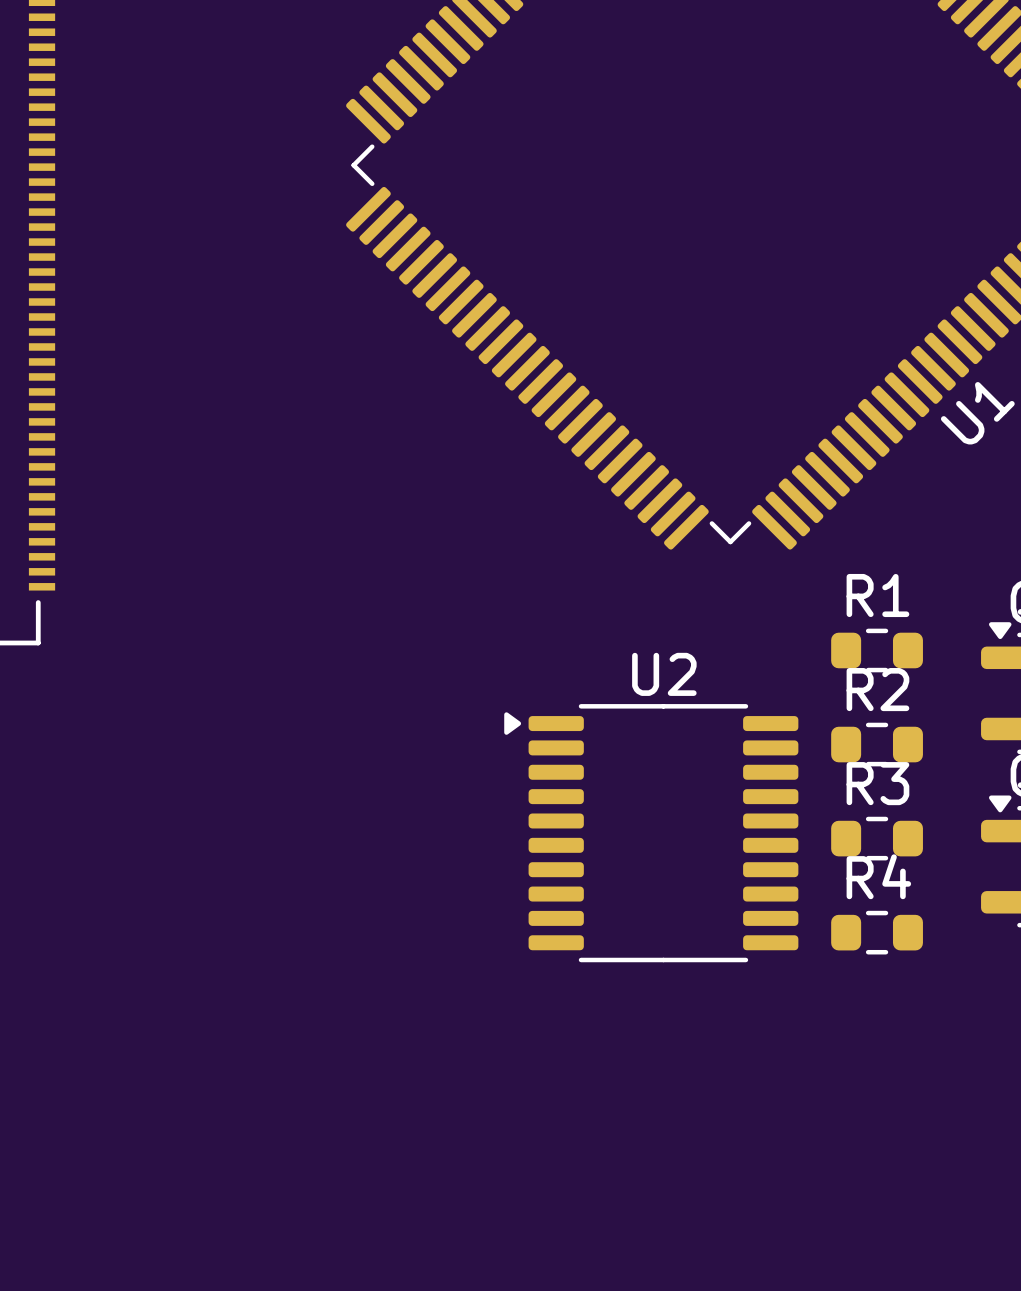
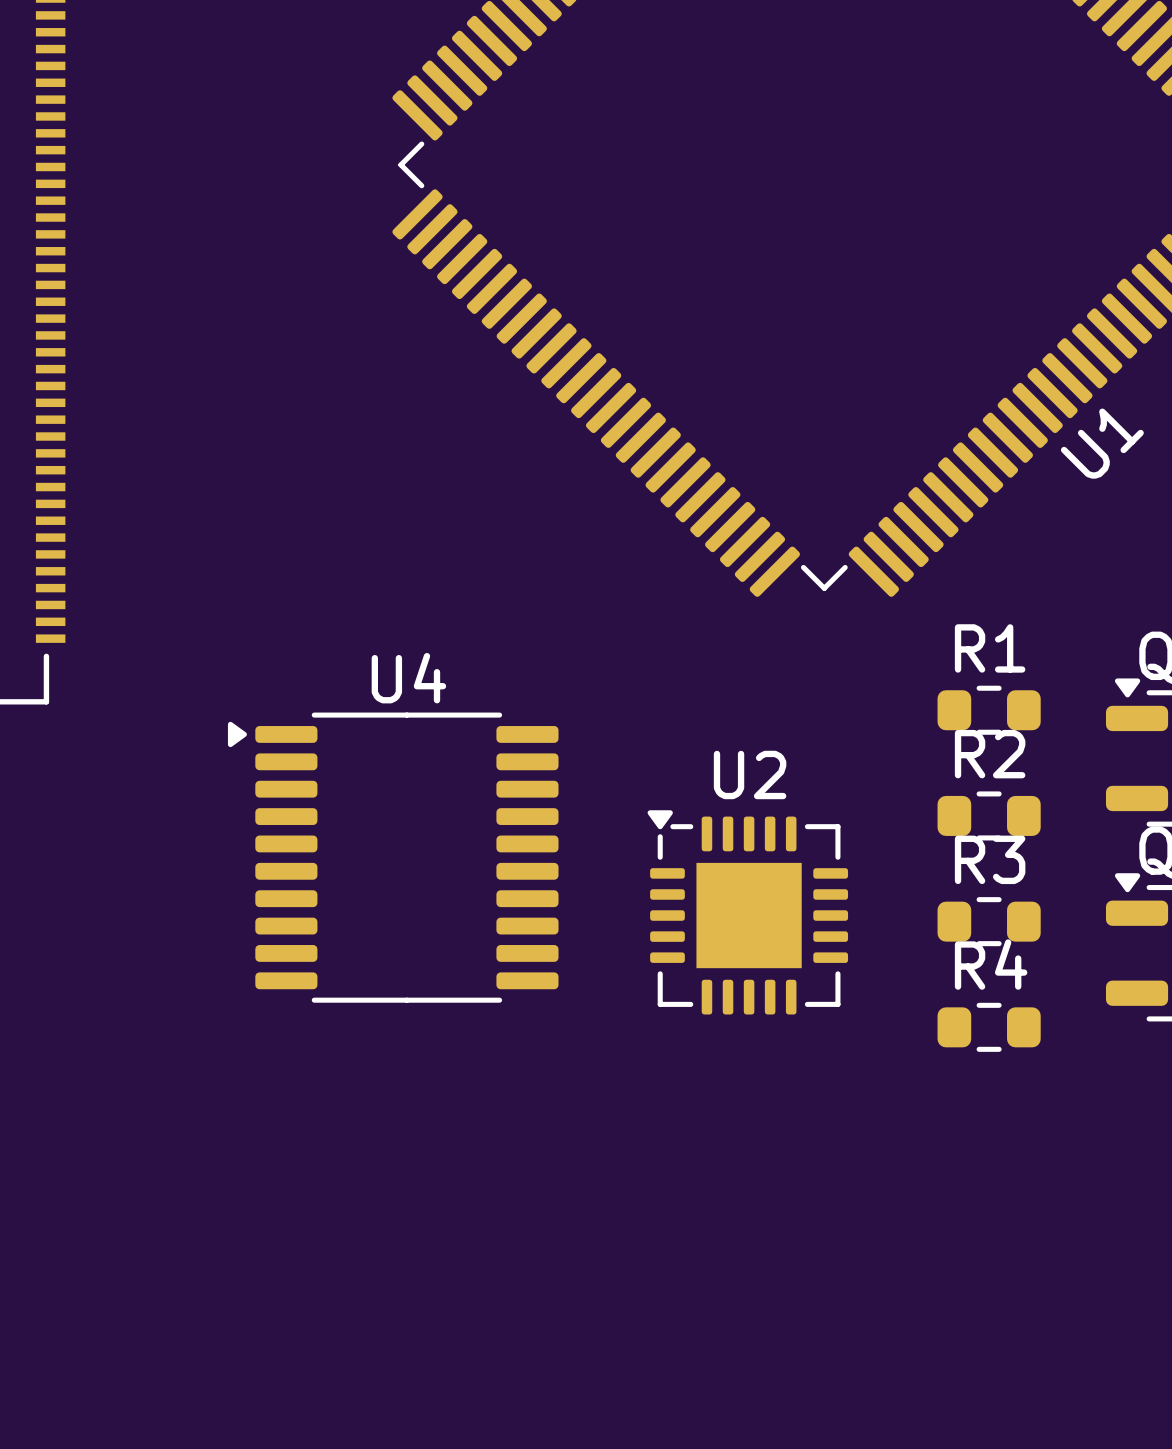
U2 footprint: [504, 704, 799, 963] -> [647, 810, 849, 1015]
U4: none -> (393, 857)

